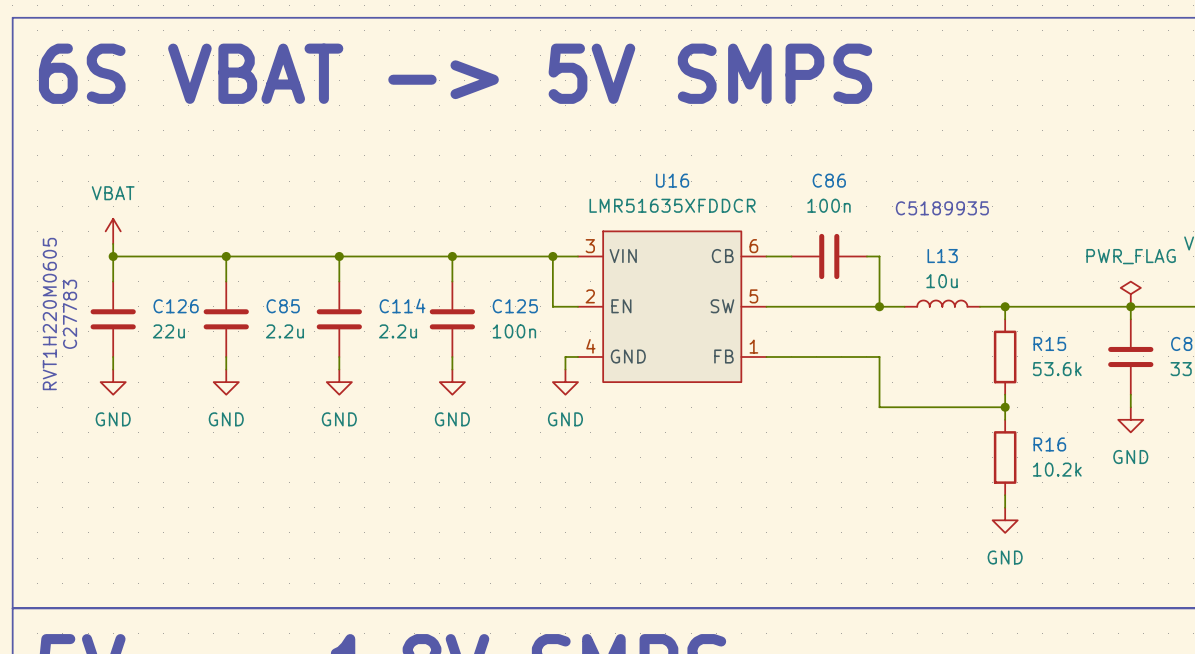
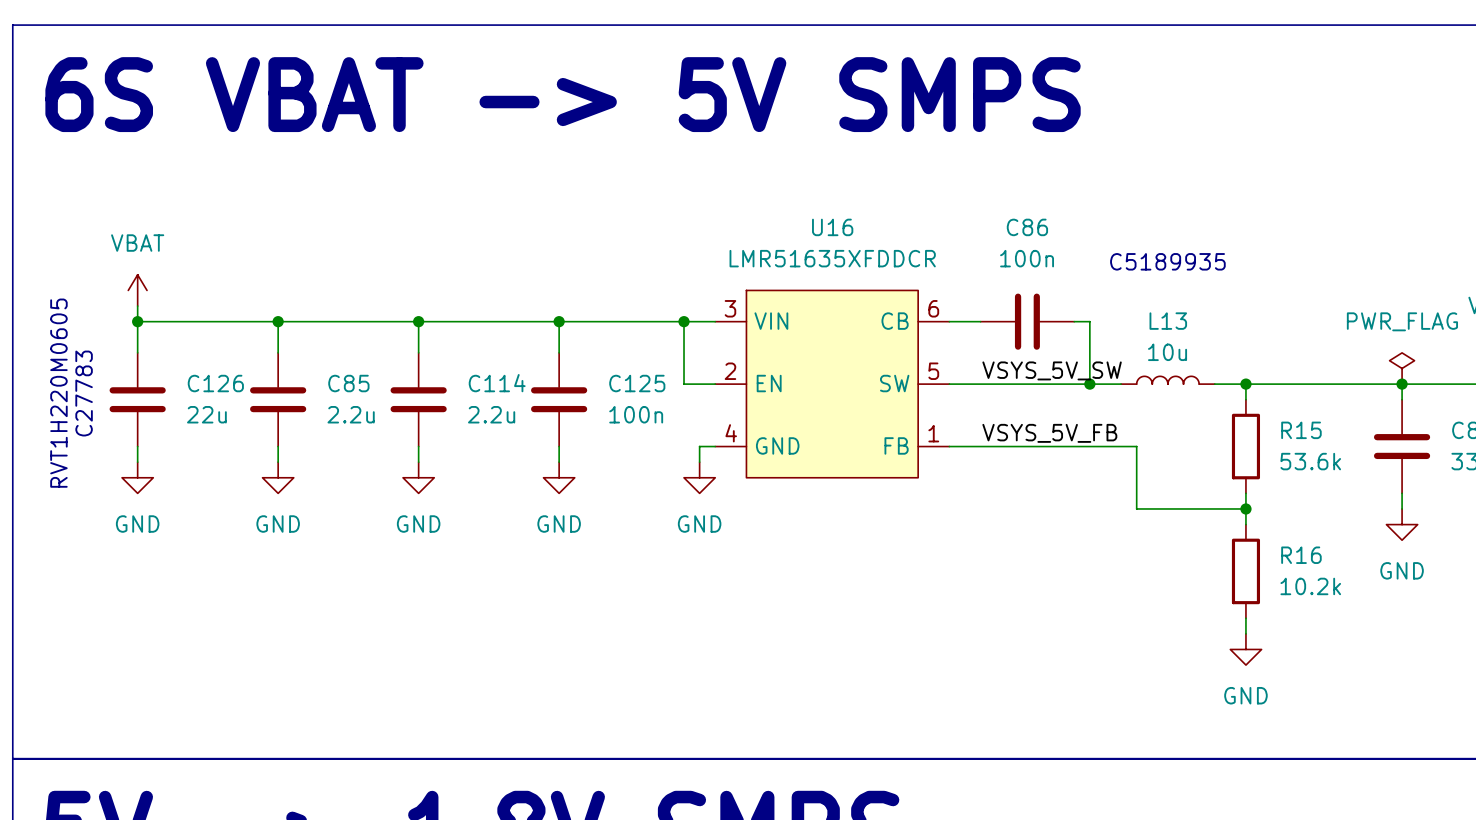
label: none -> VSYS_5V_SW (1052, 370)
label: none -> VSYS_5V_FB (1049, 433)
wire: (879, 356) (879, 407) (917, 407) -> (1089, 446) (1136, 446) (1136, 508)

